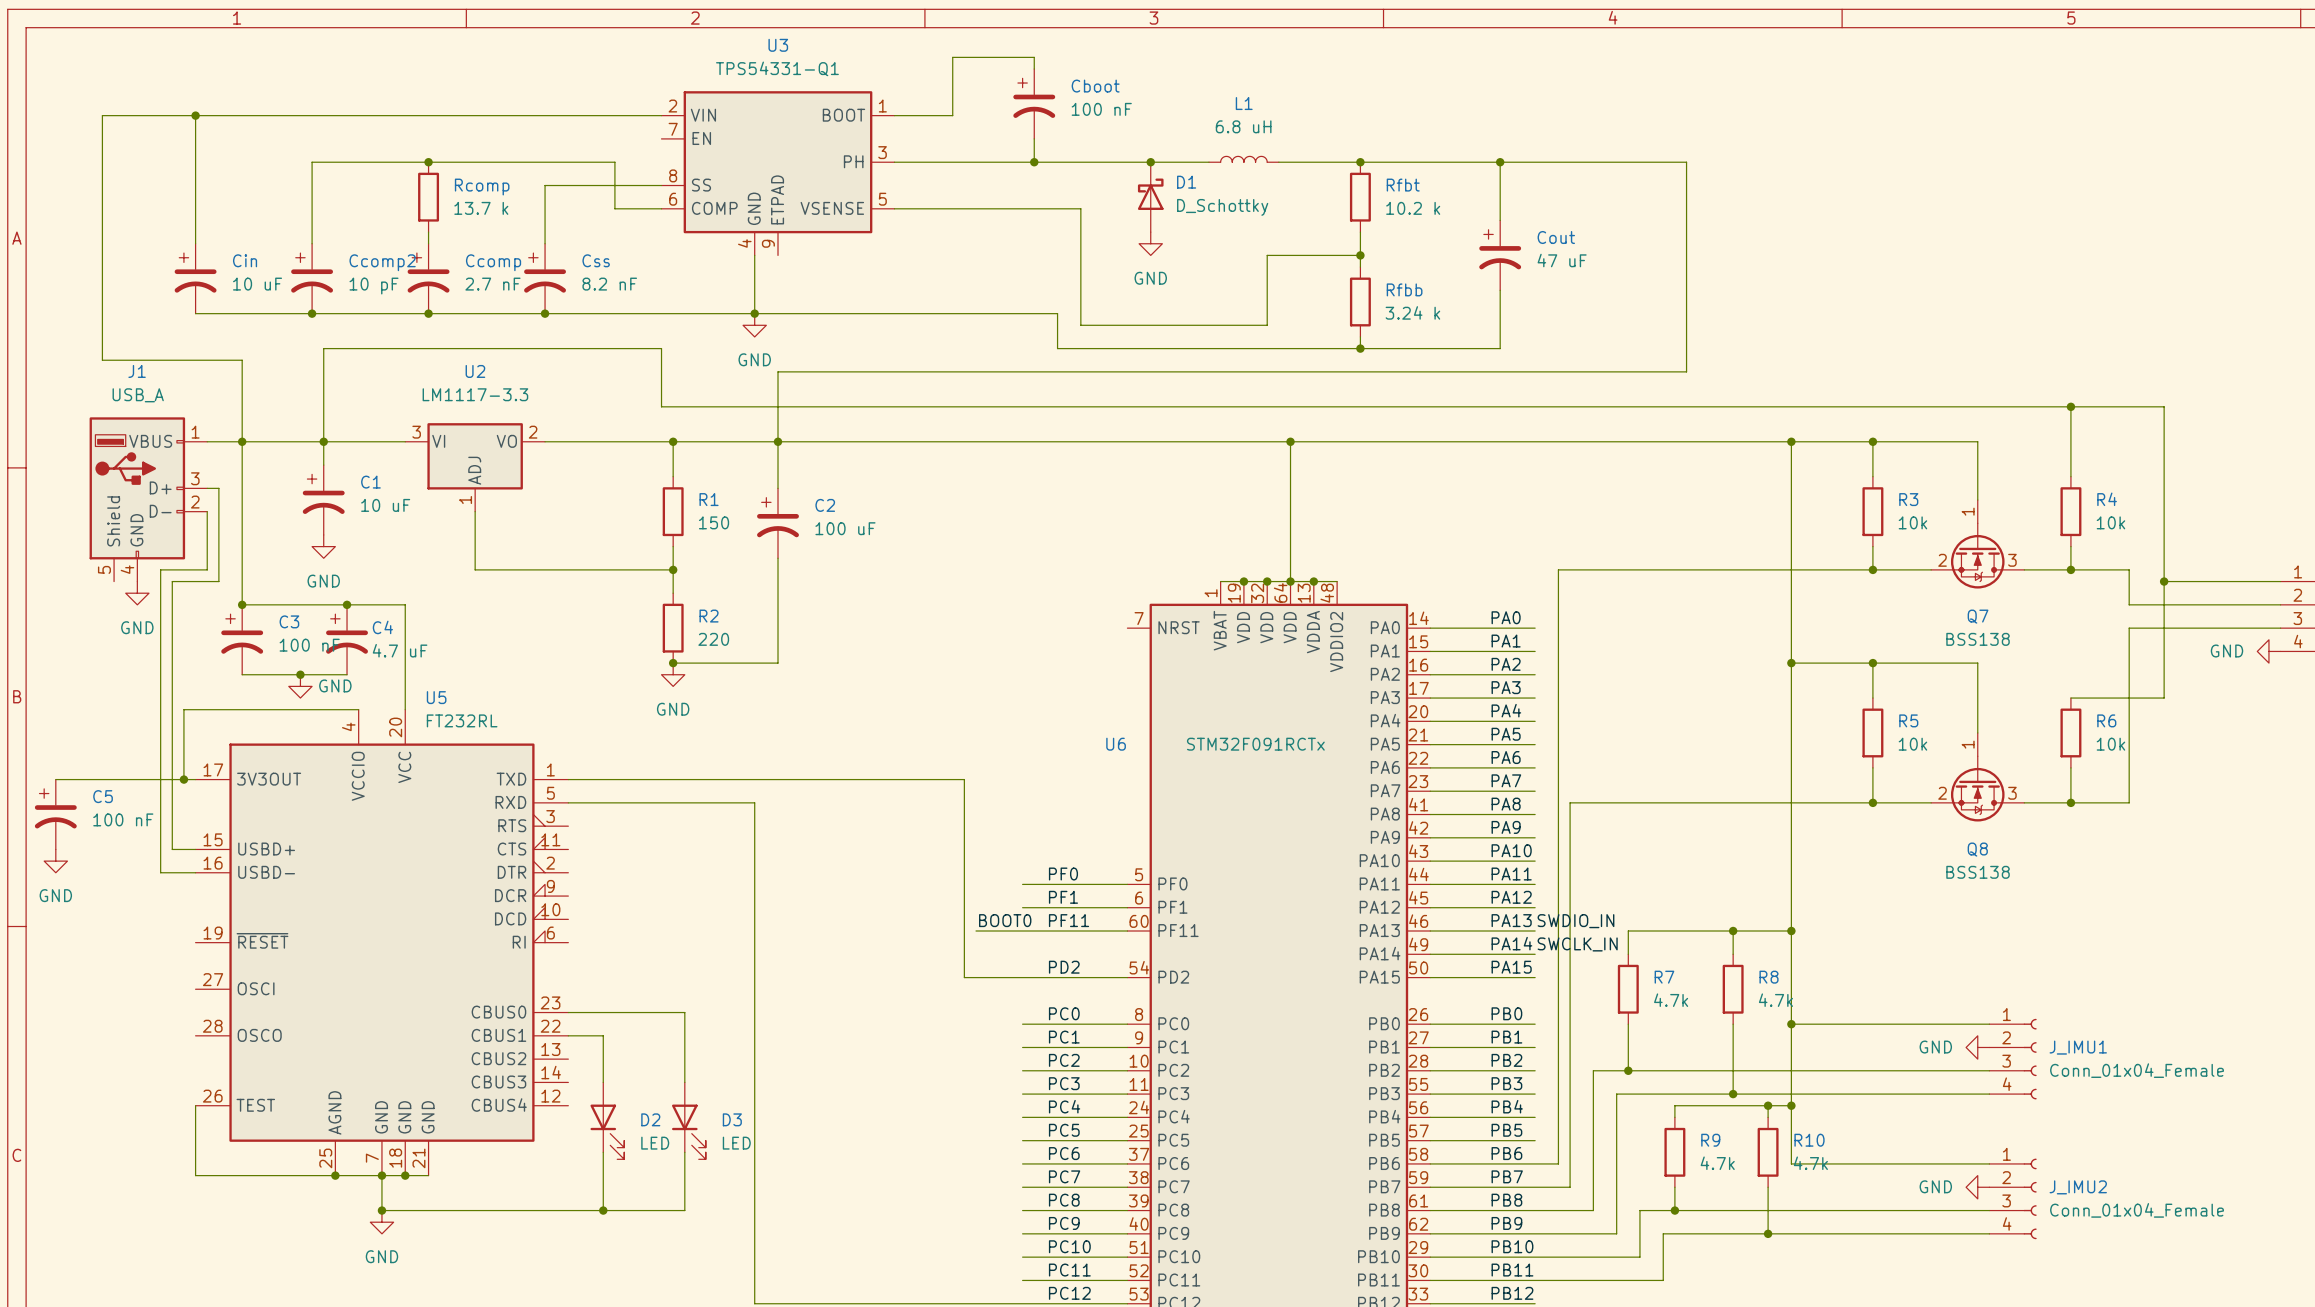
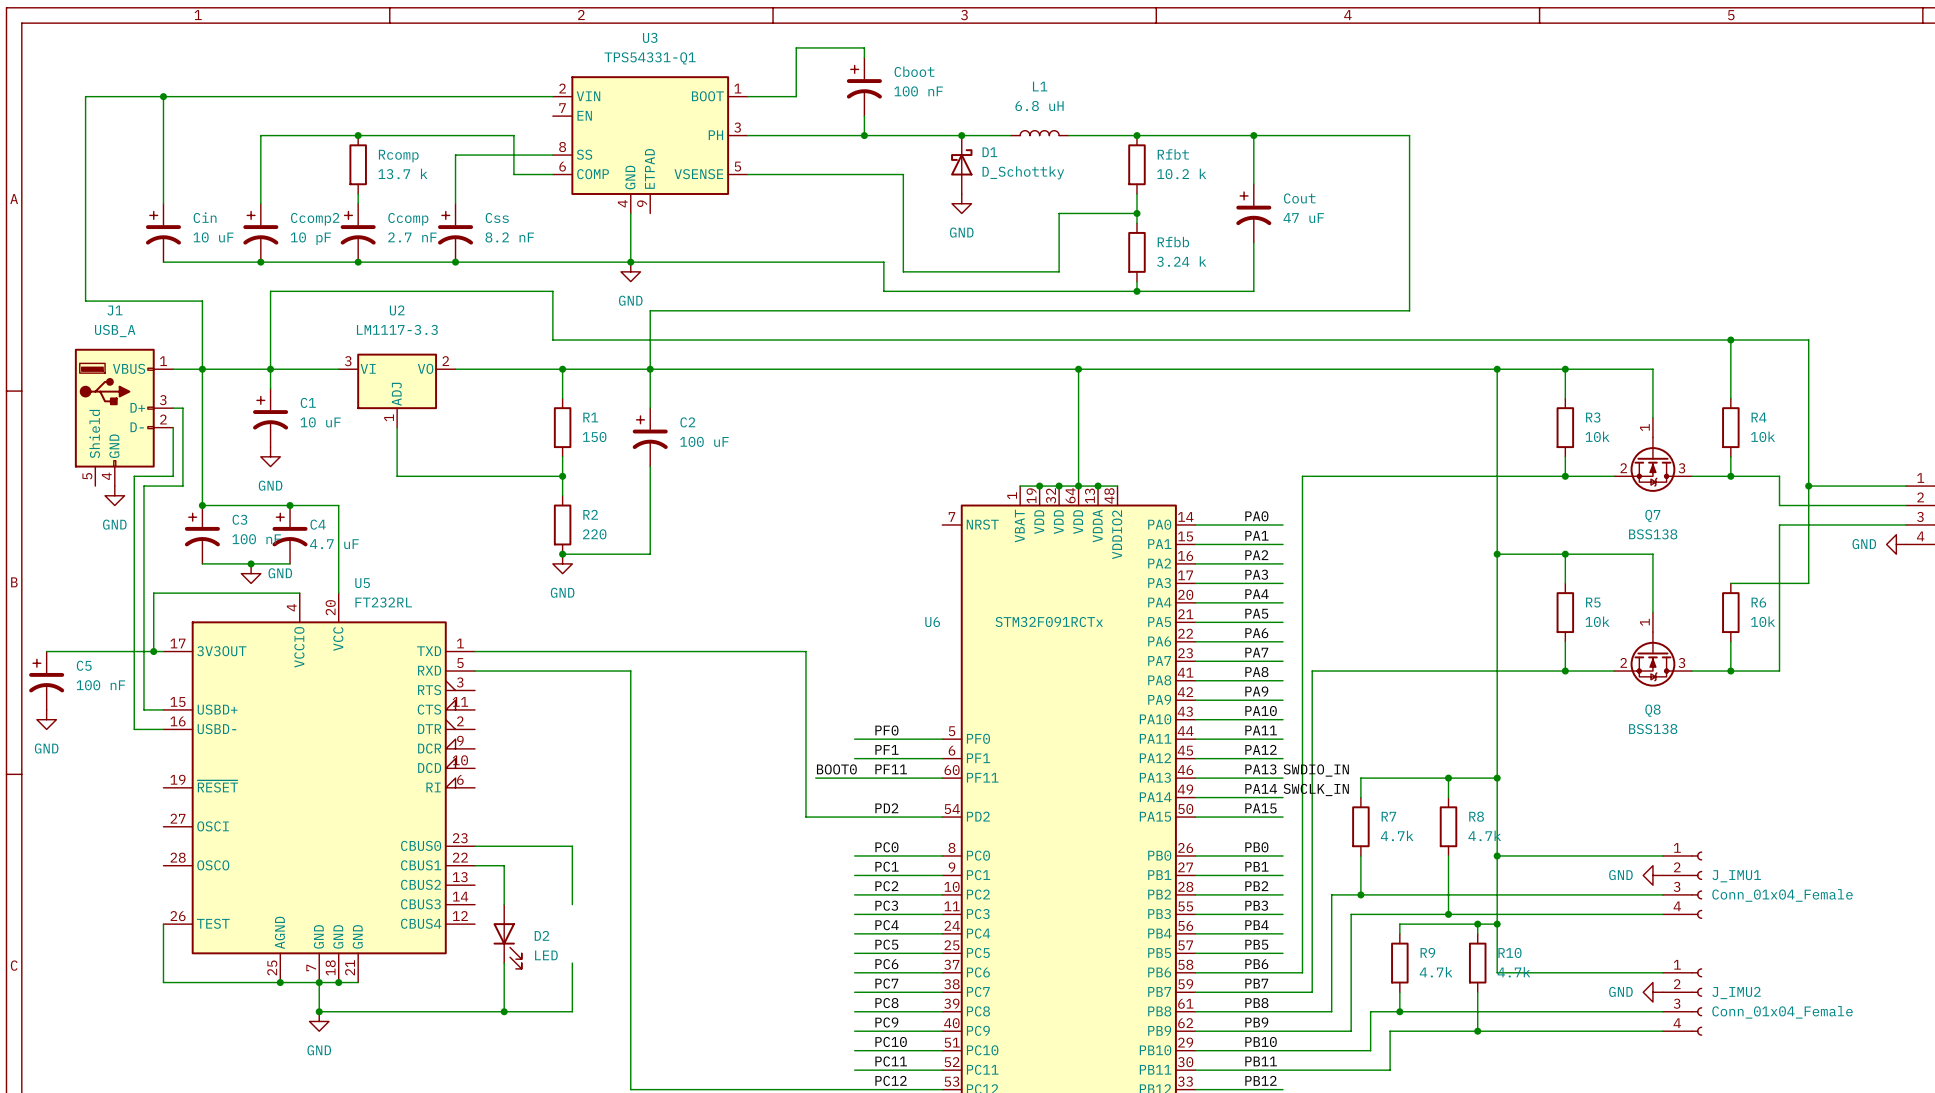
D3: LED (688, 1120) -> none

